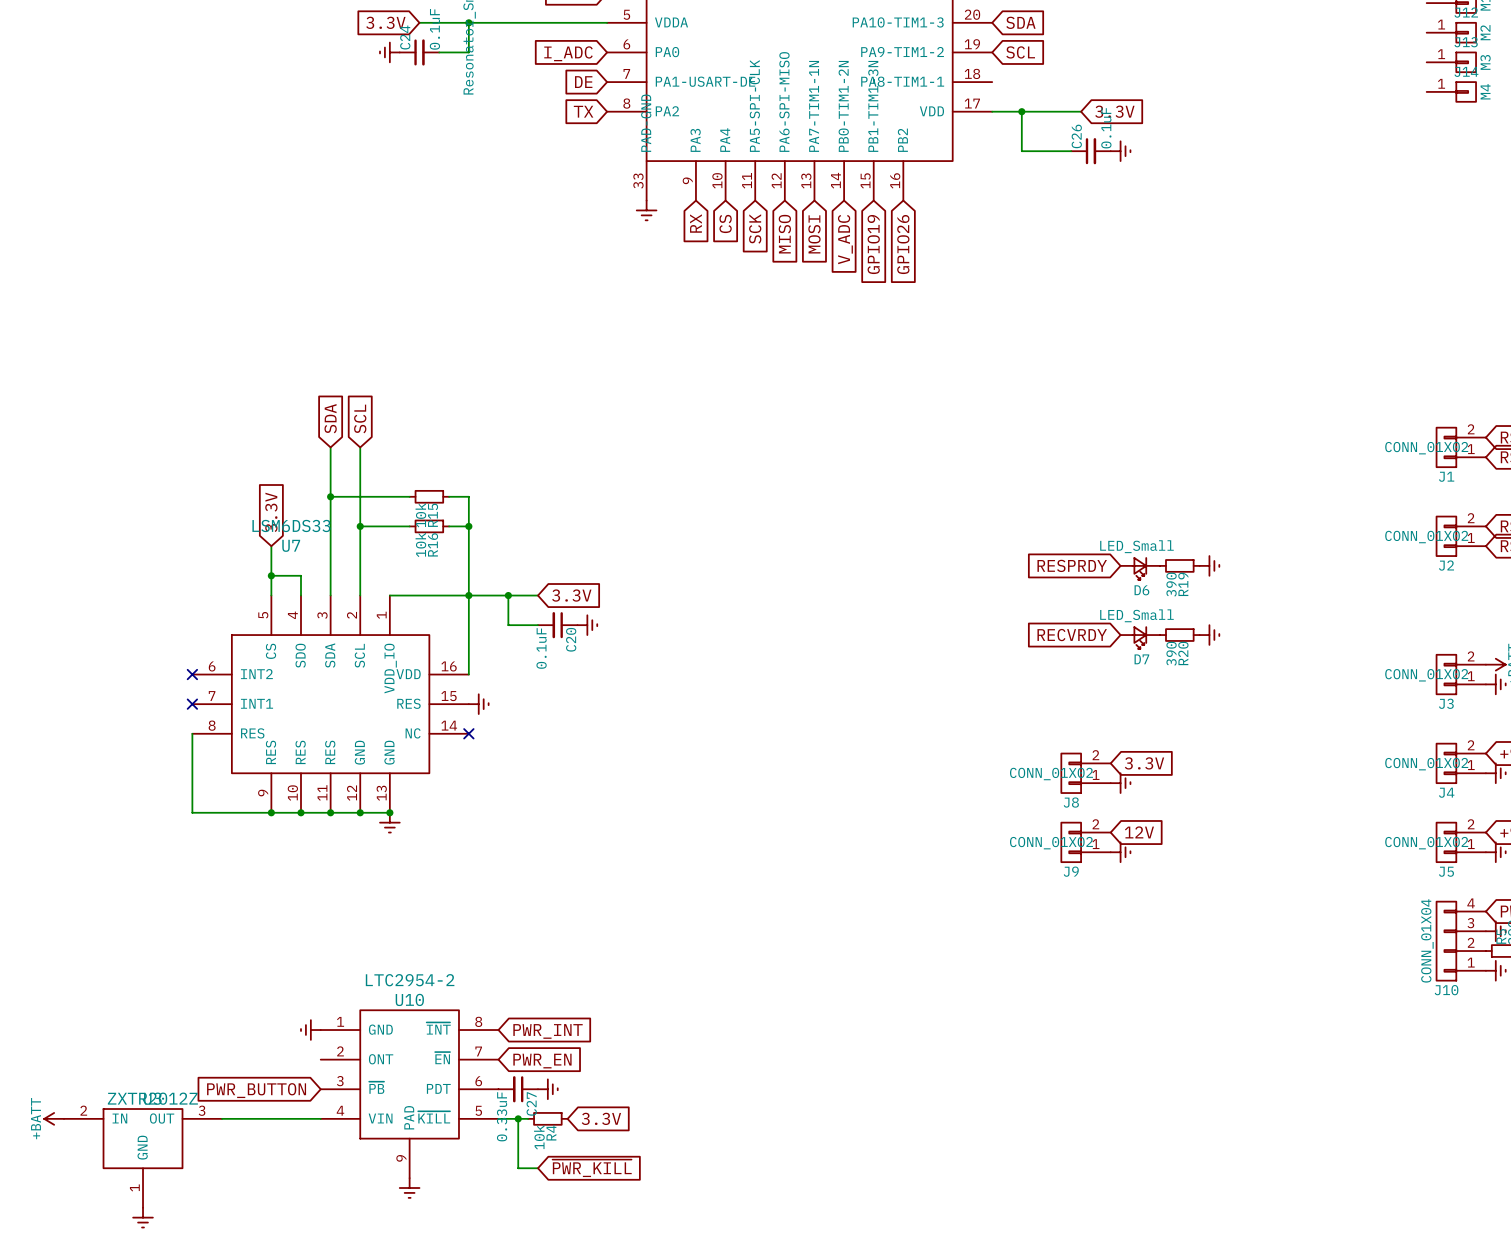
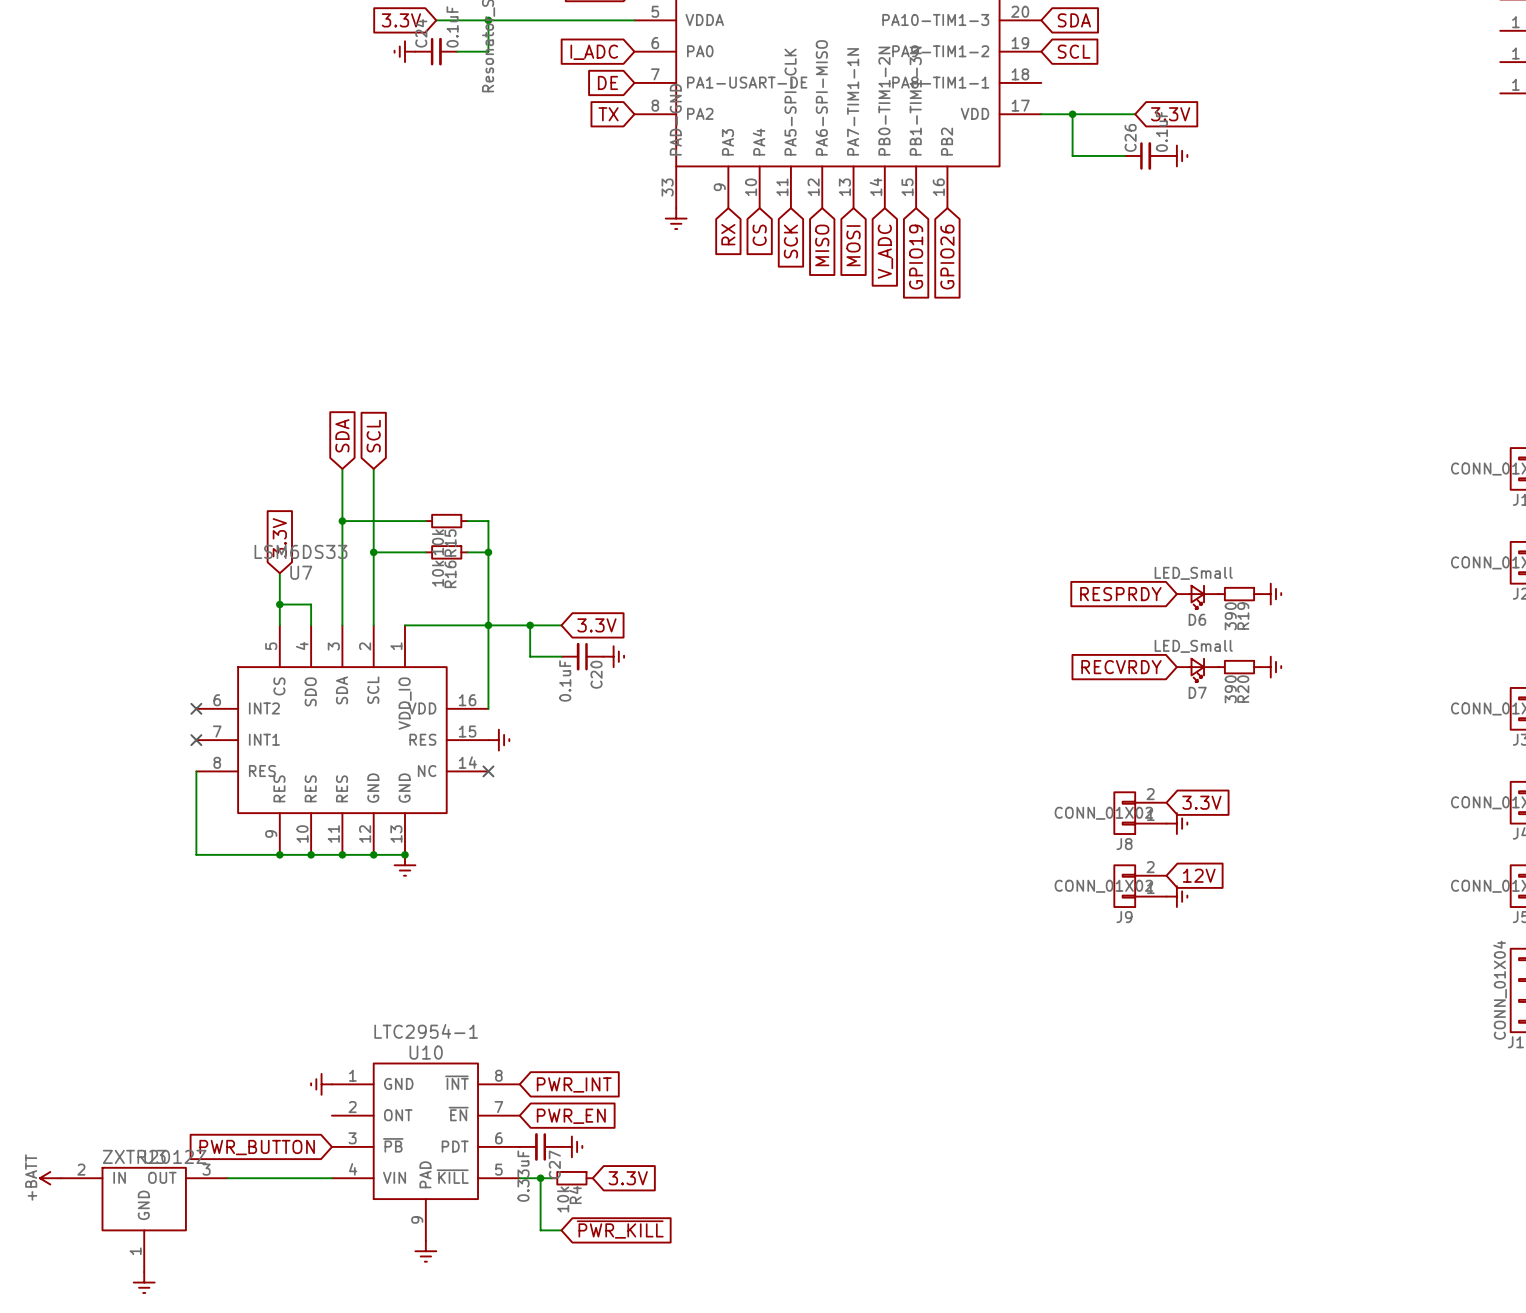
U10 value: LTC2954-2 (410, 980) -> LTC2954-1 (426, 1031)

